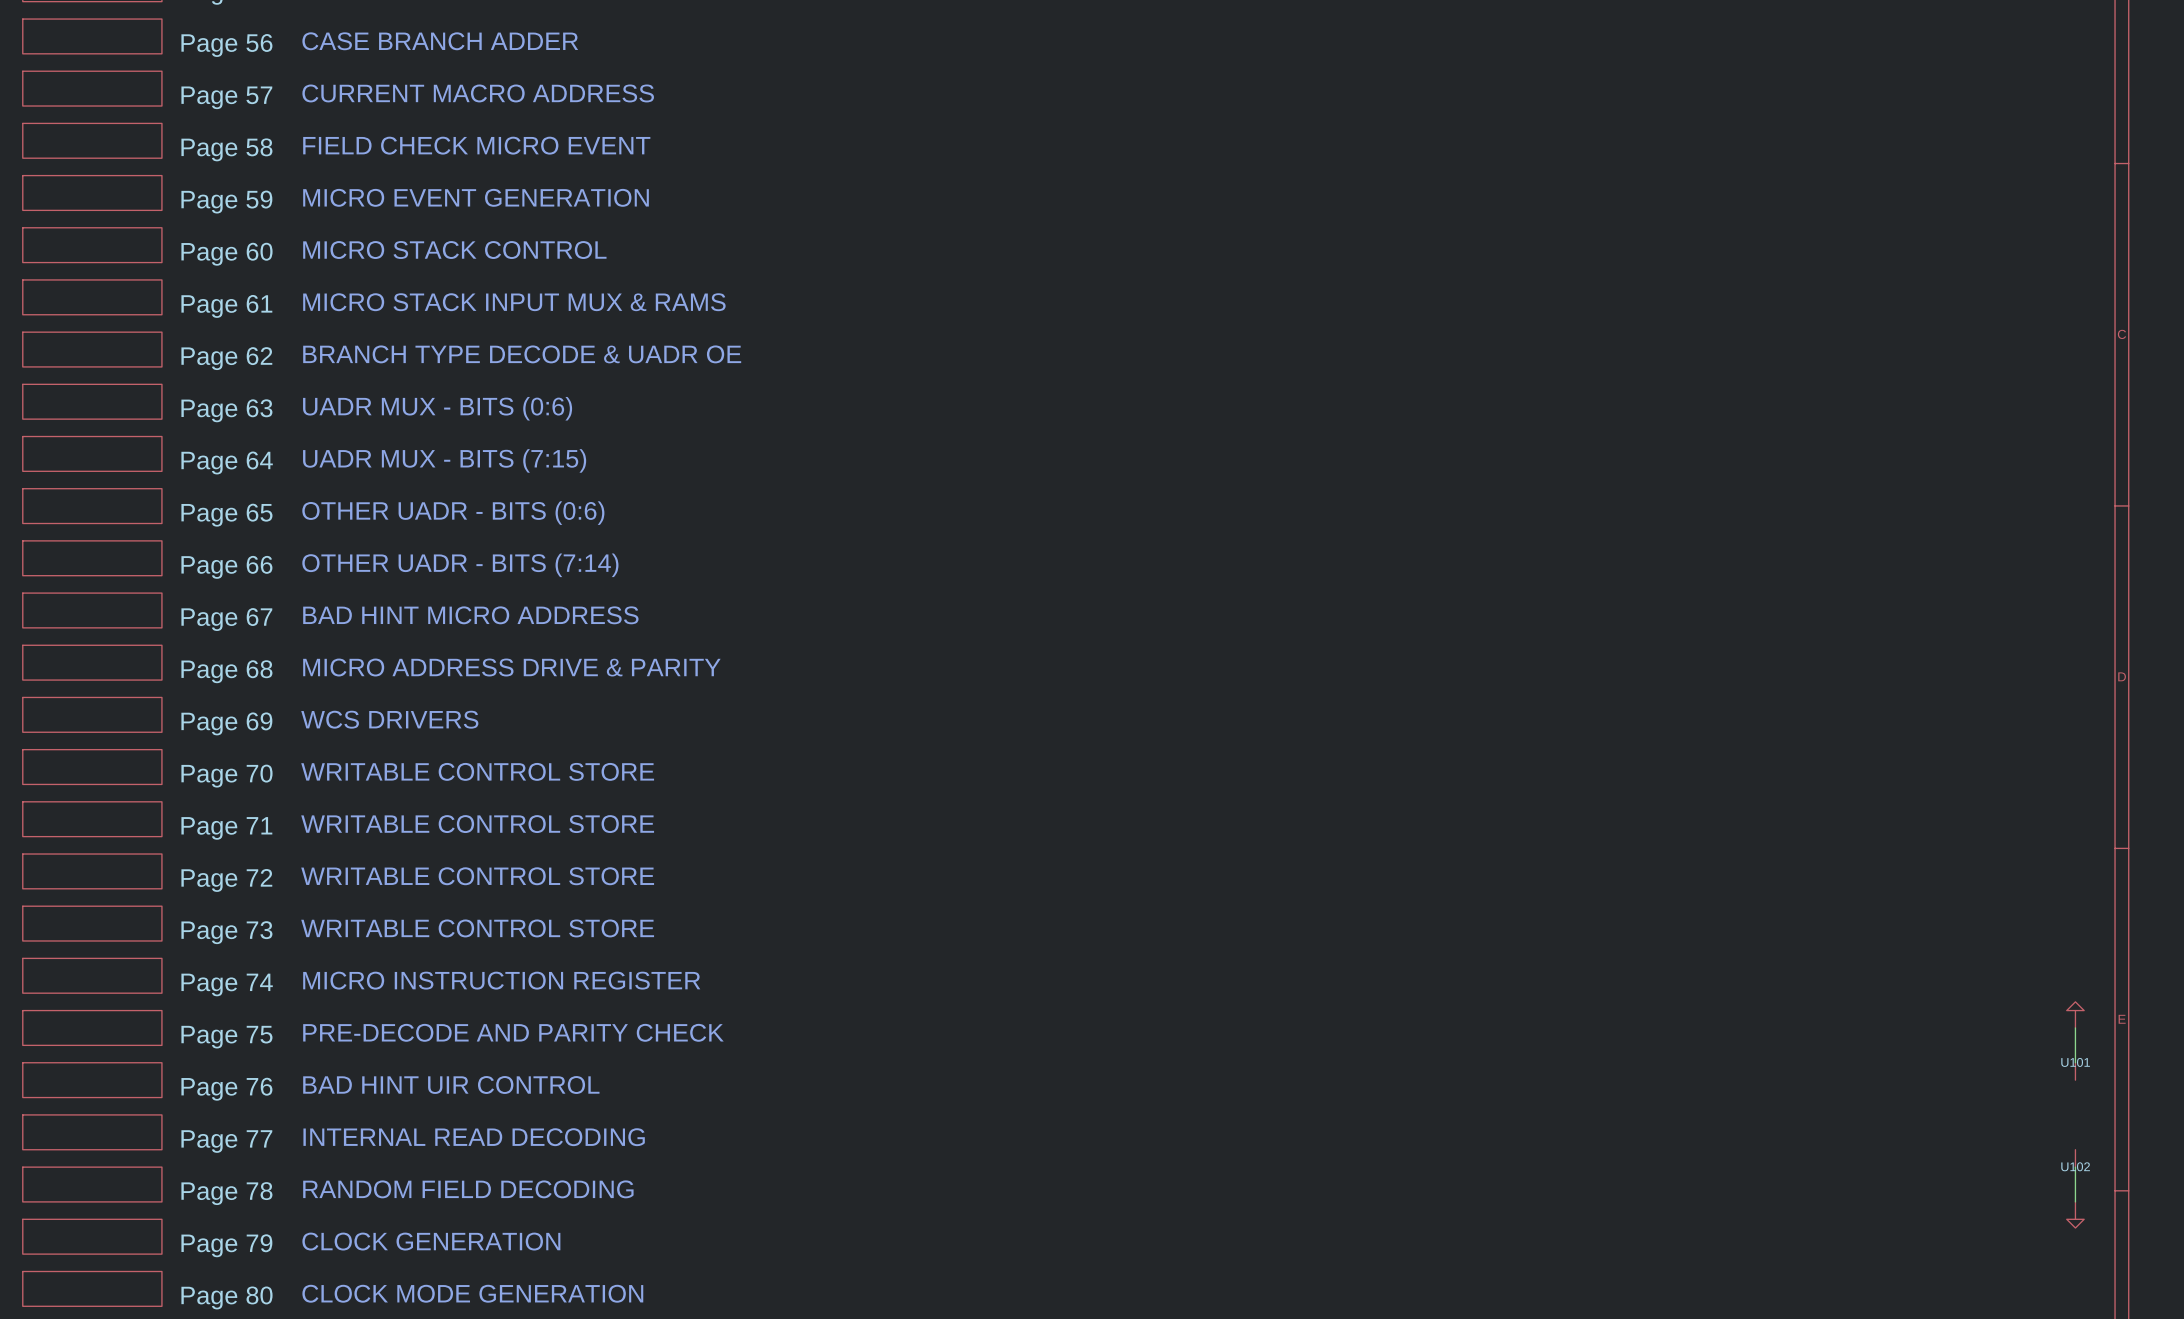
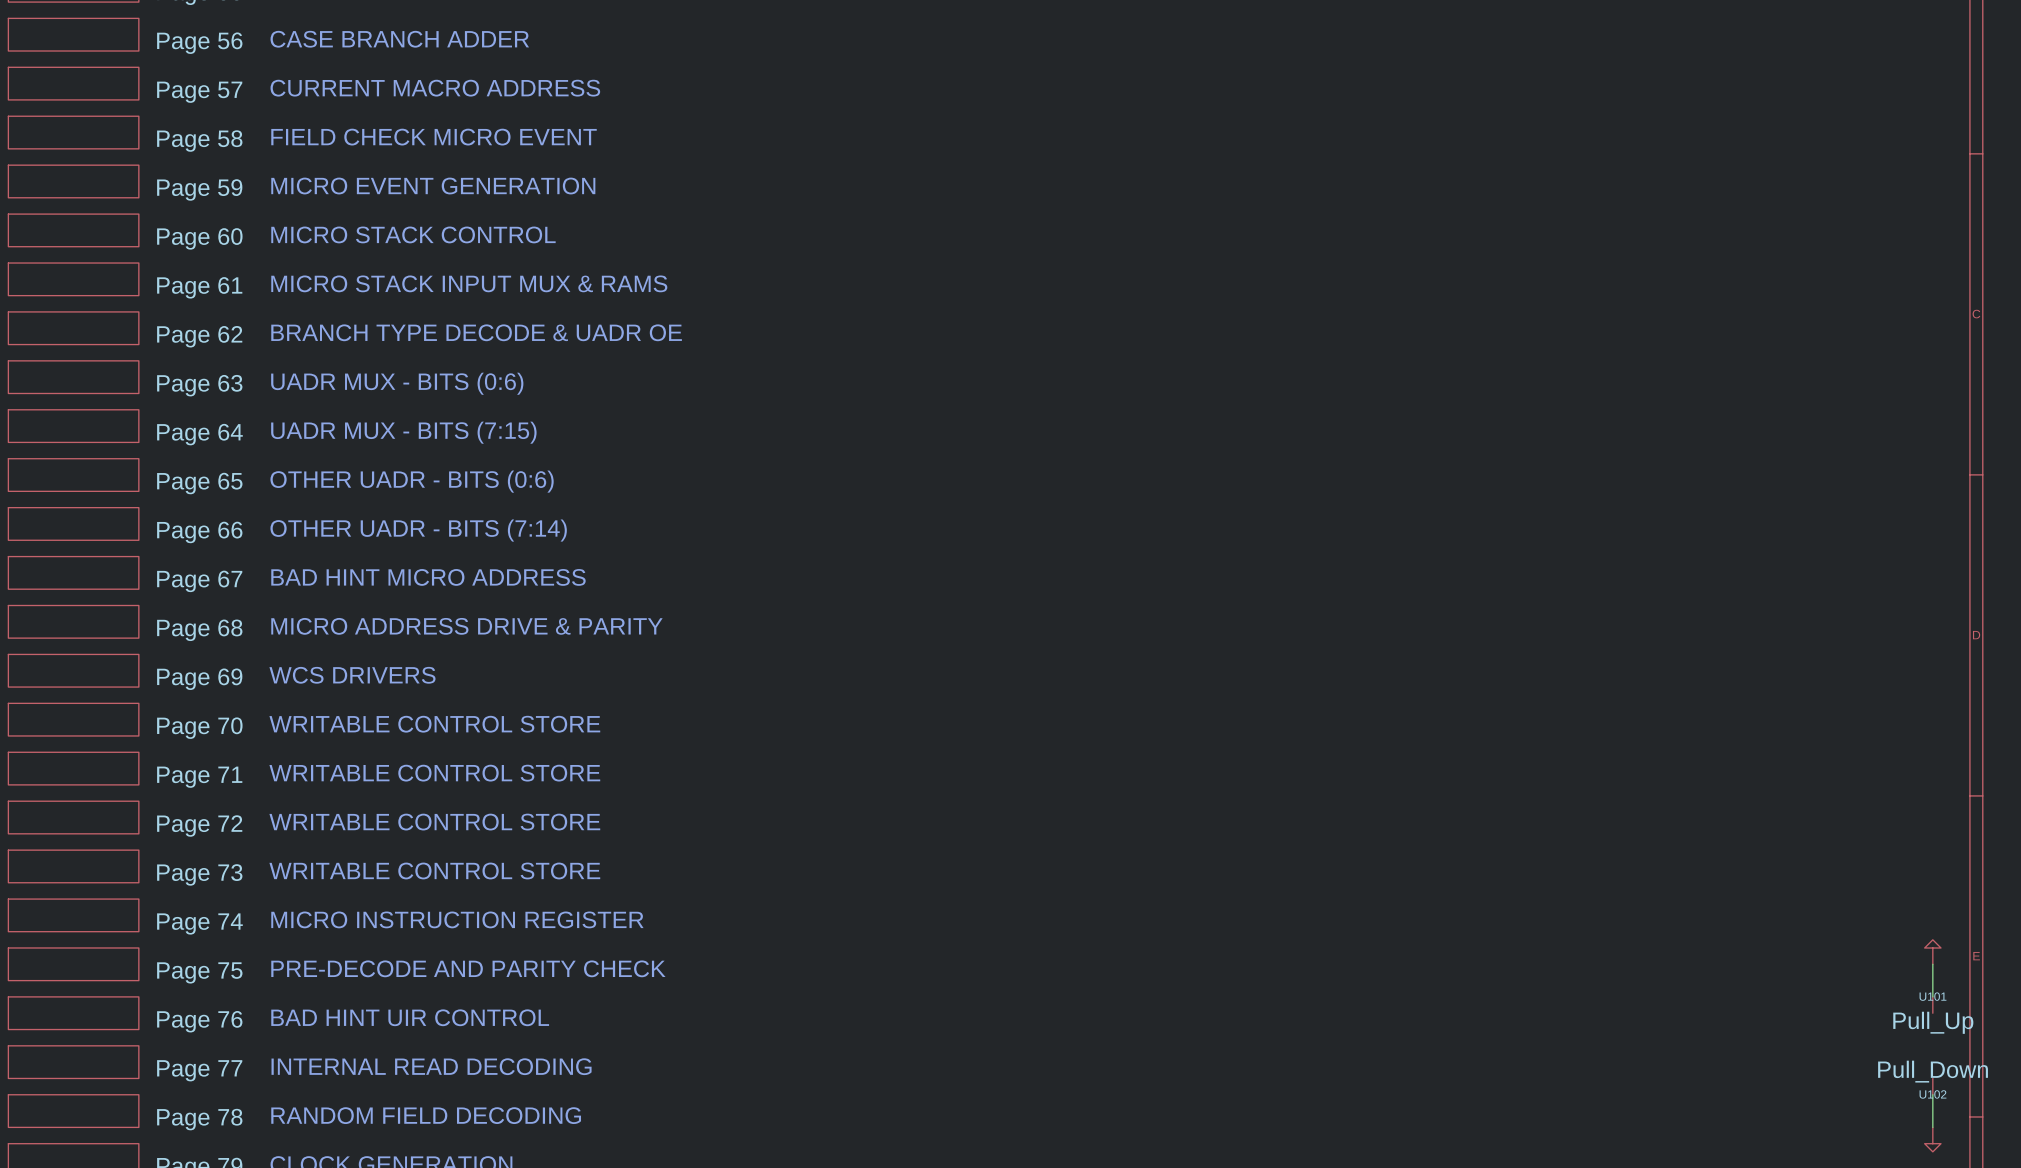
U101 value: none -> Pull_Up (1933, 1022)
U102 value: none -> Pull_Down (1933, 1071)

